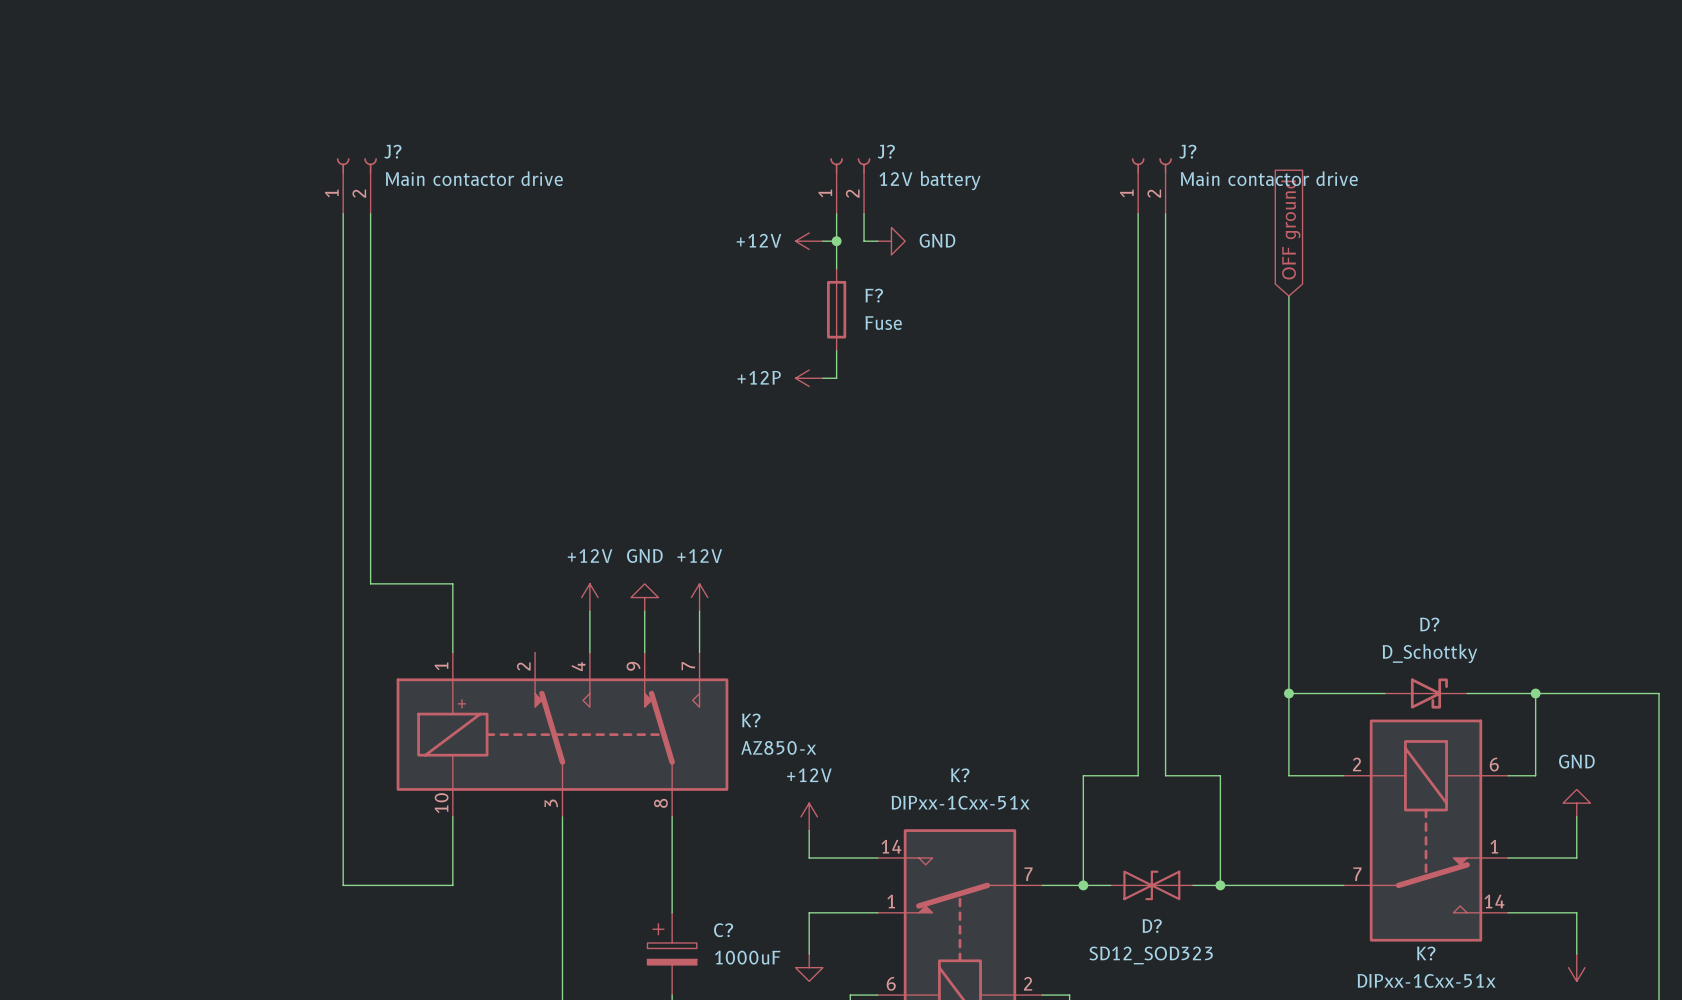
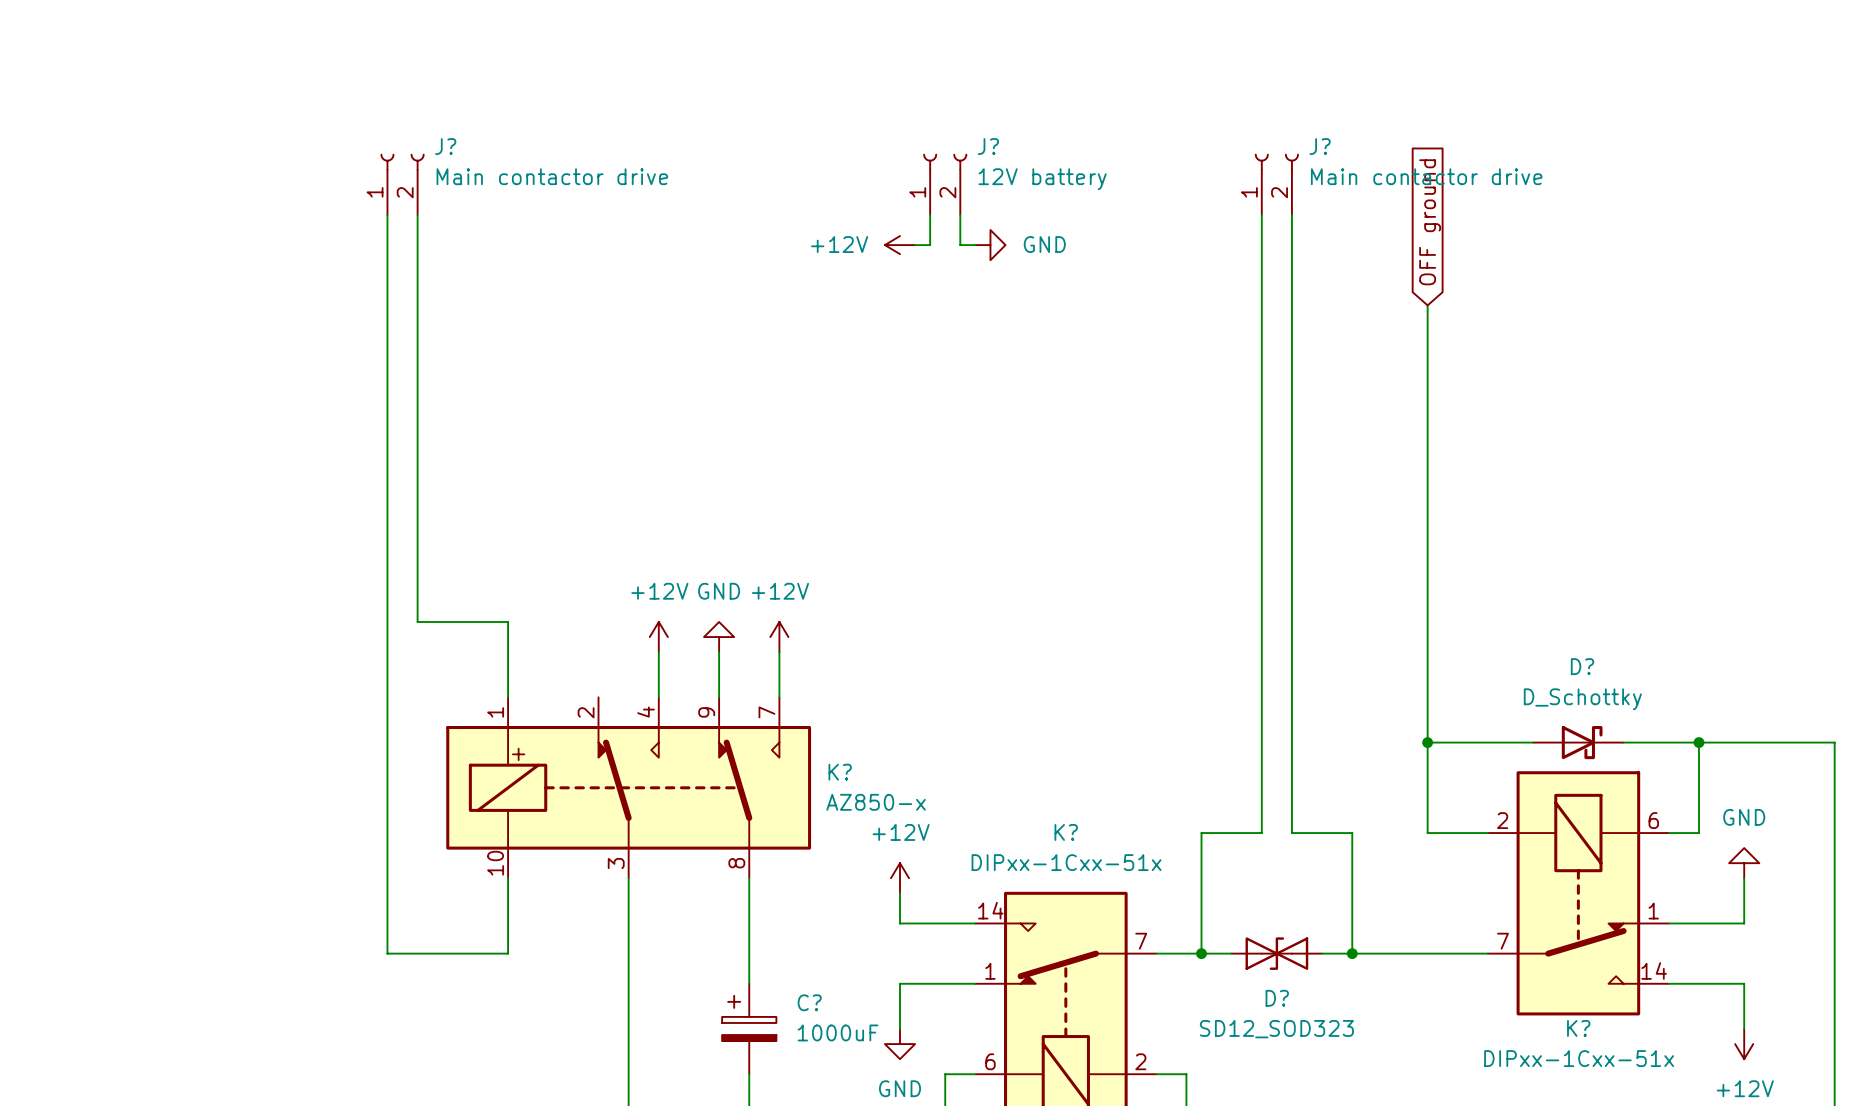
wire: (836, 241) (836, 268) -> none
junction: (836, 241) -> none
F?: Fuse (836, 309) -> none
wire: (836, 350) (836, 378) (822, 378) -> none
power symbol: +12P (809, 378) -> none

